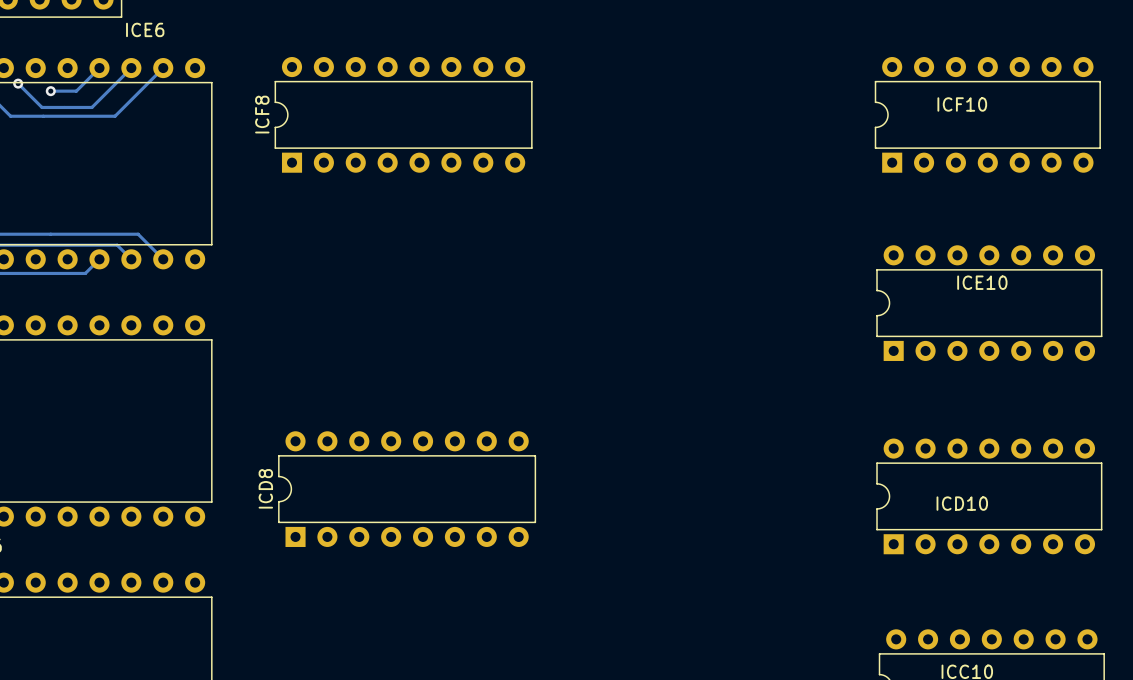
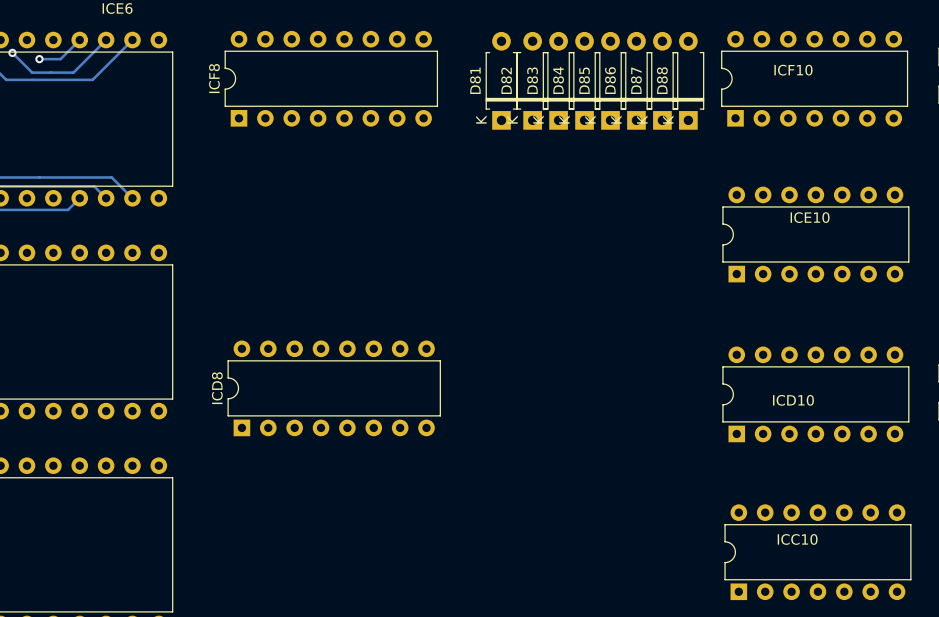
D81: none -> (501, 80)
D82: none -> (532, 80)
D83: none -> (558, 80)
D84: none -> (584, 80)
D85: none -> (610, 80)
D86: none -> (636, 80)
D87: none -> (662, 80)
D88: none -> (688, 80)

